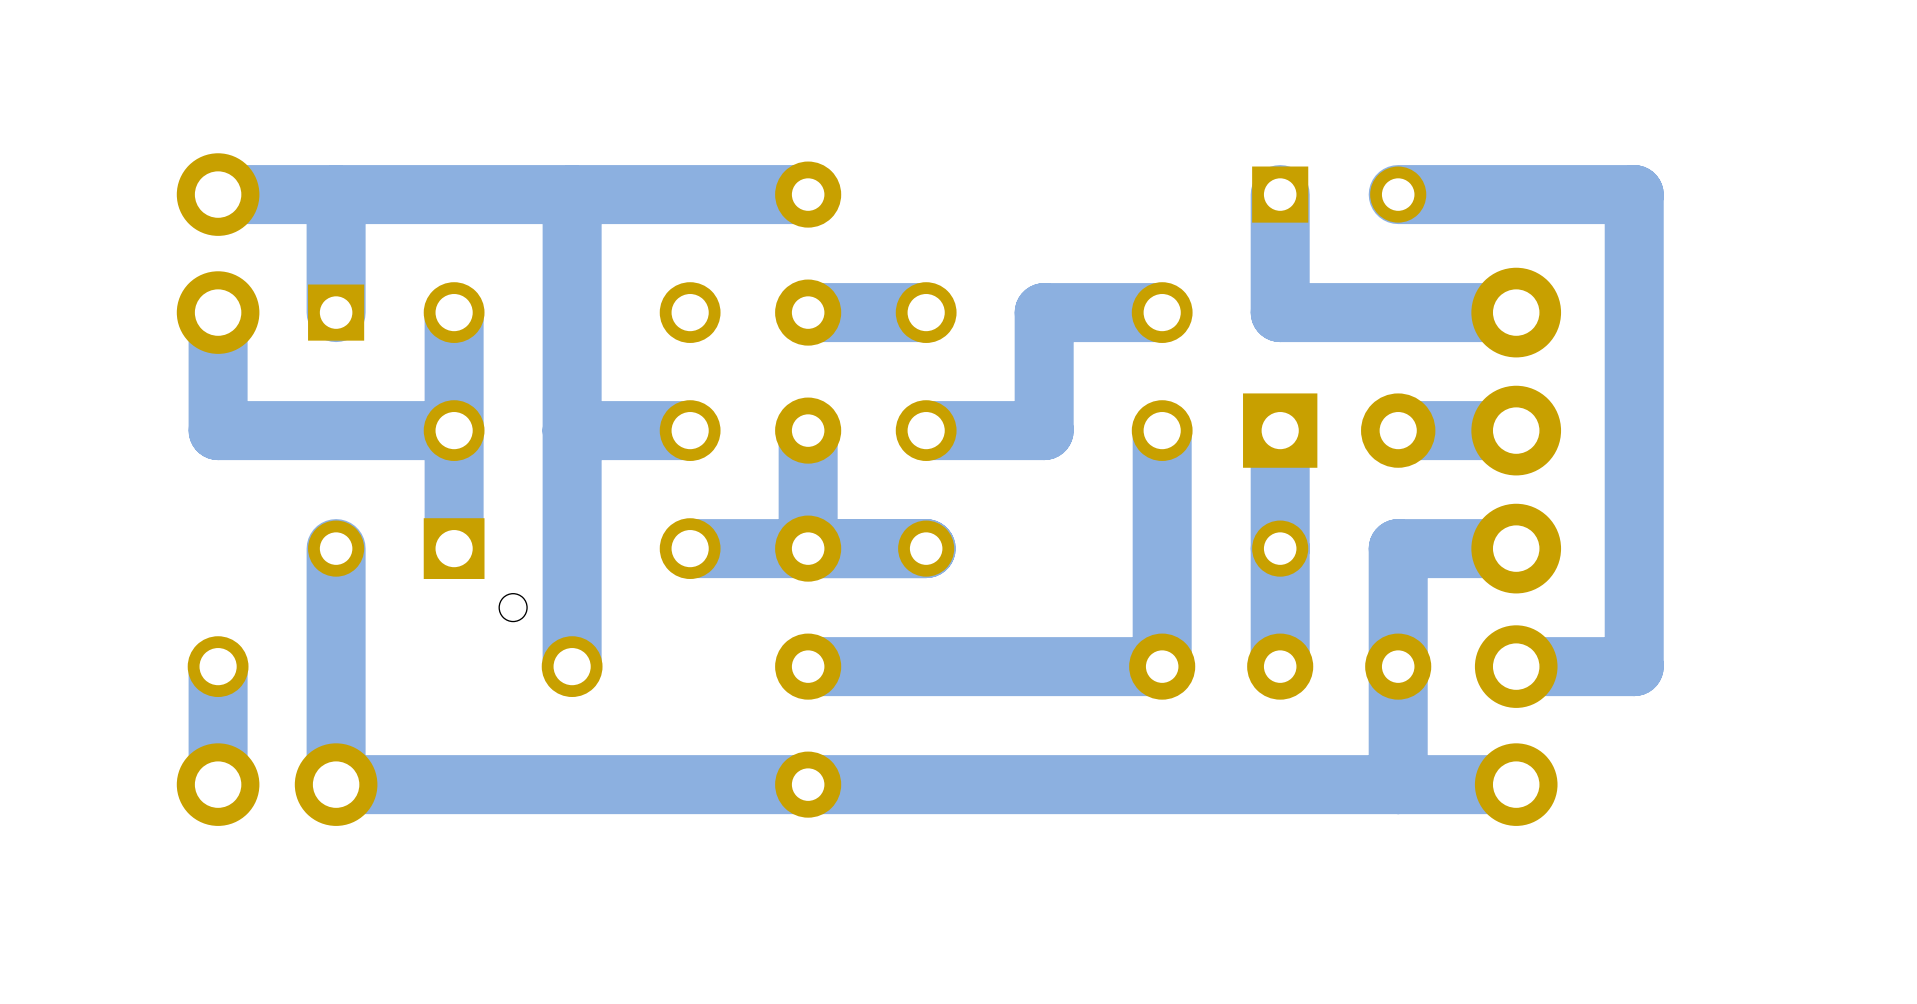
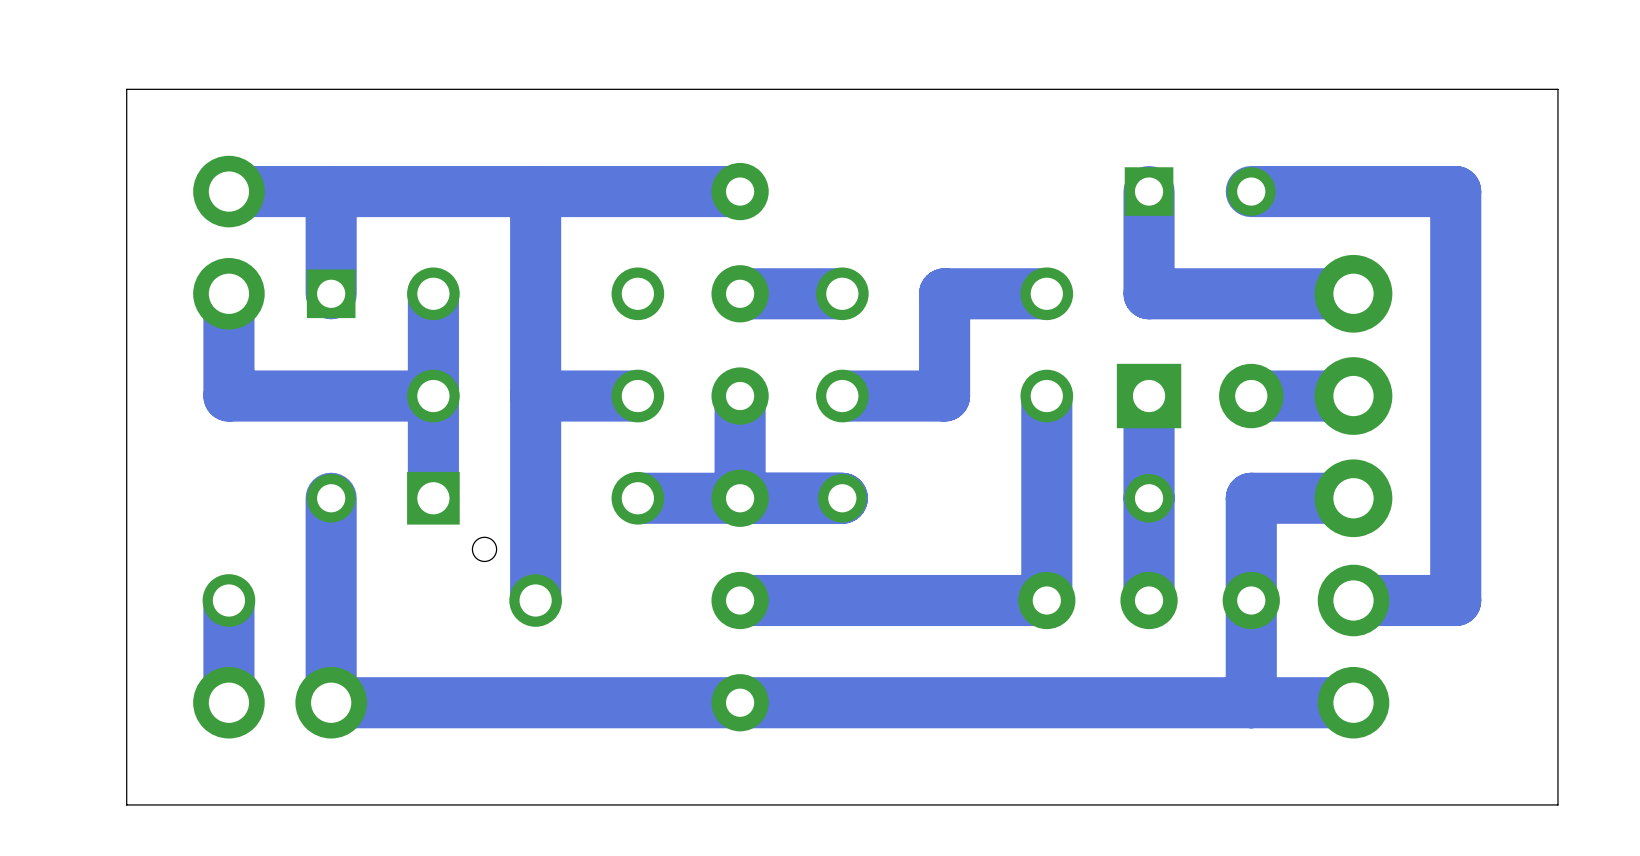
board edge: none -> (1557, 89) (126, 89) (126, 804) (1557, 804) (1557, 89)

